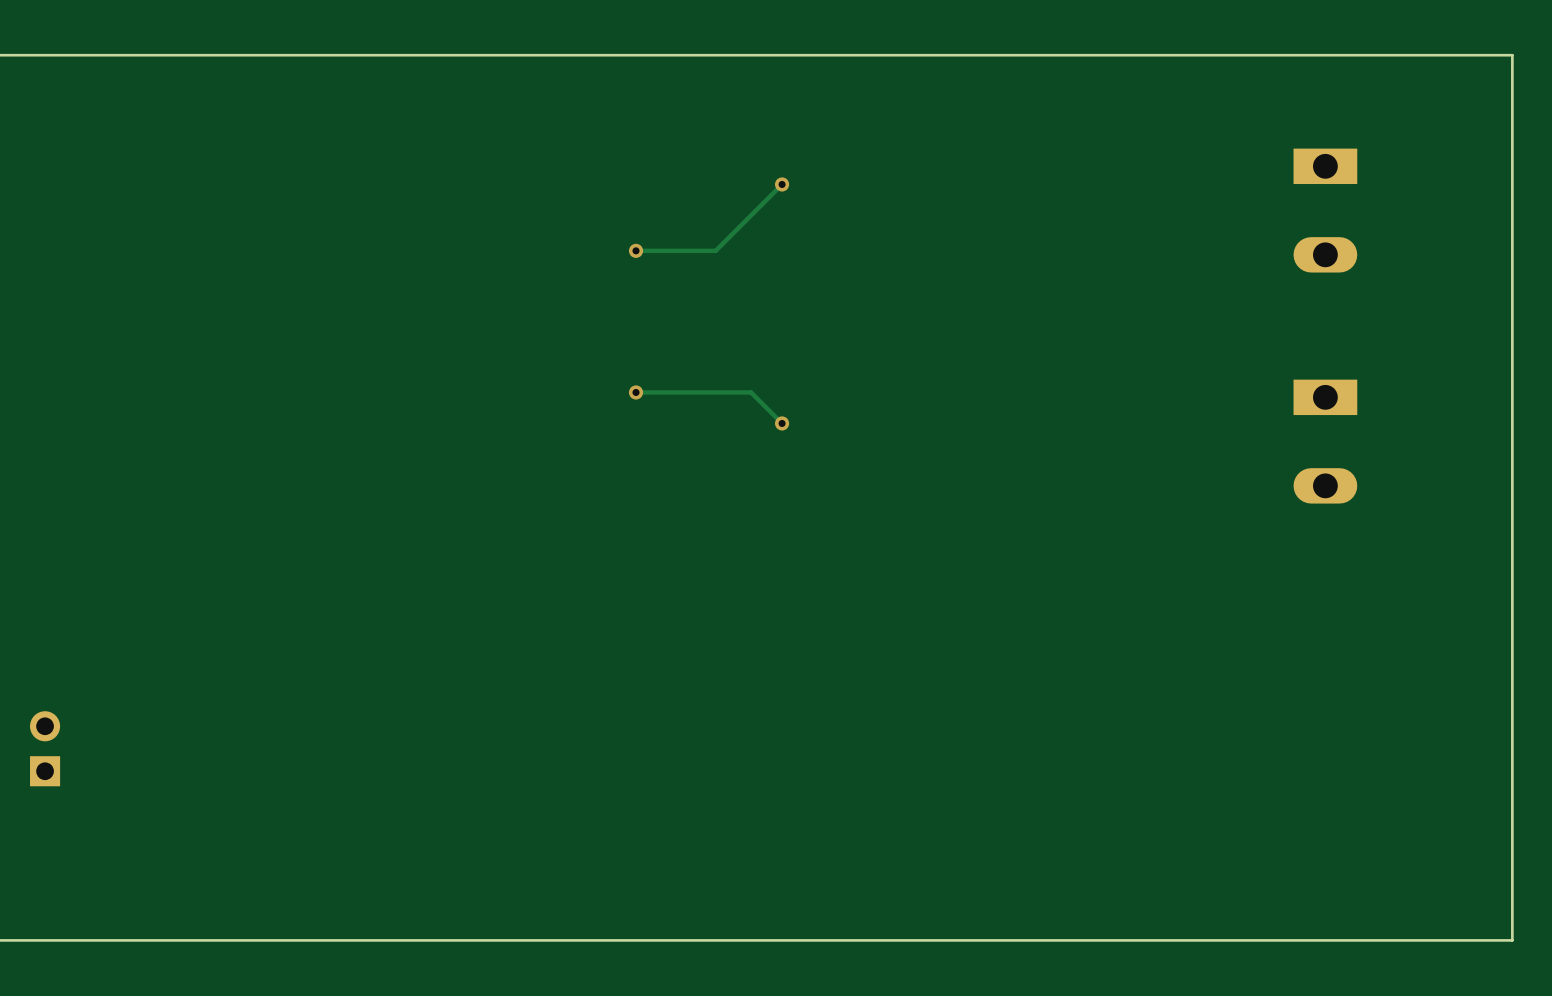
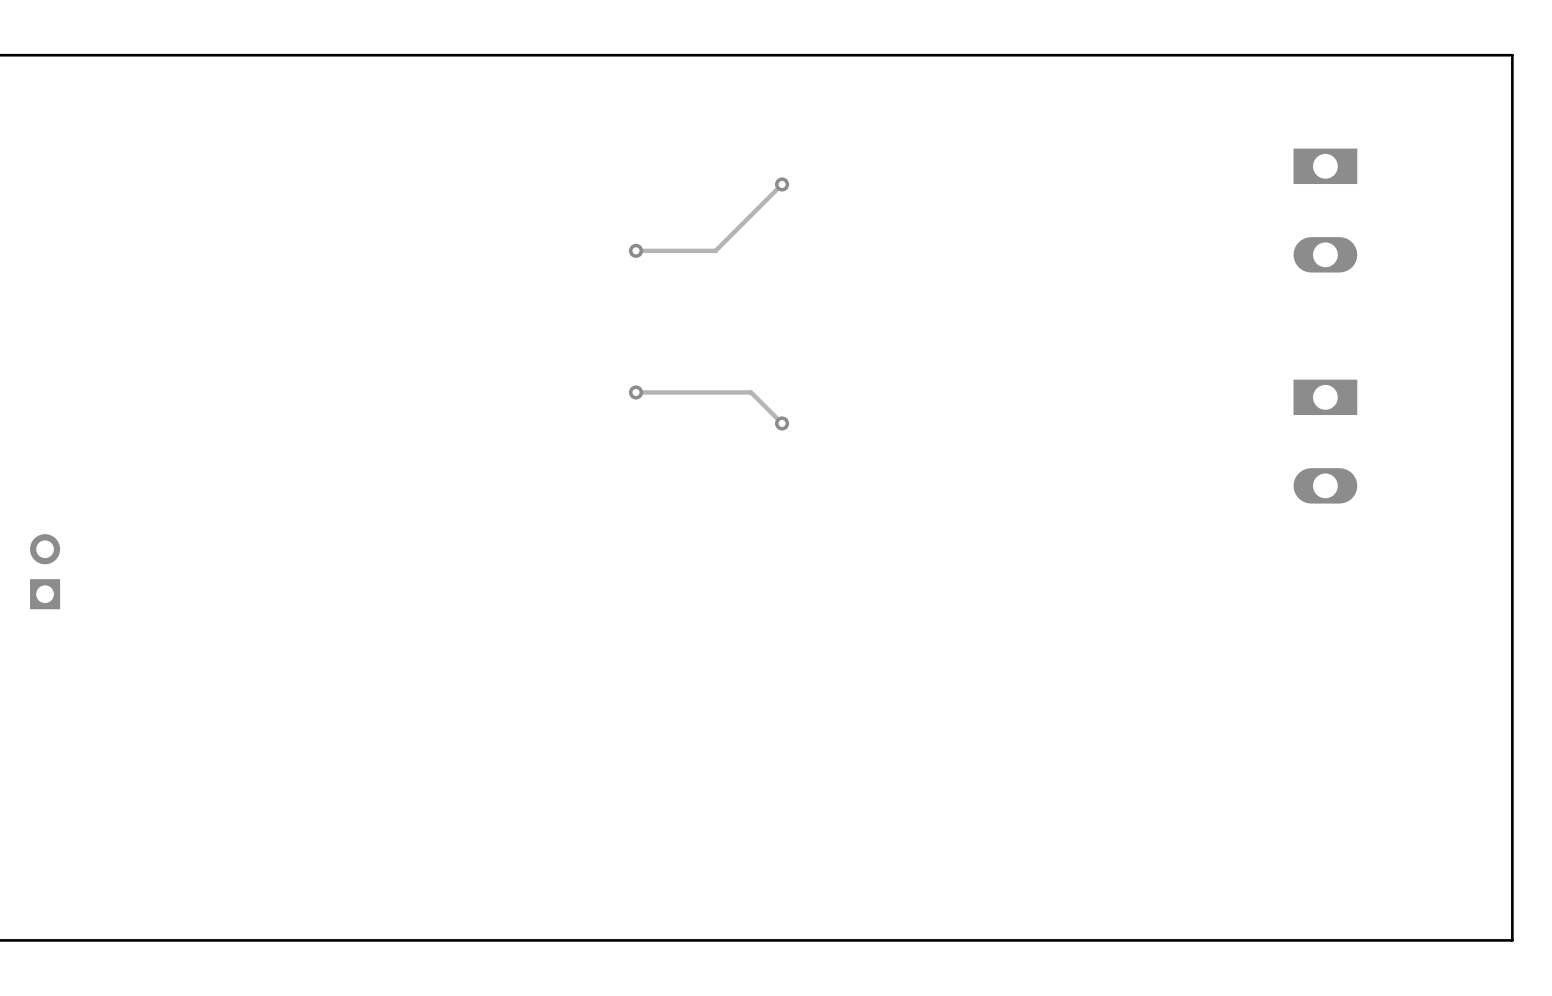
part position: (45, 748) -> (45, 571)

